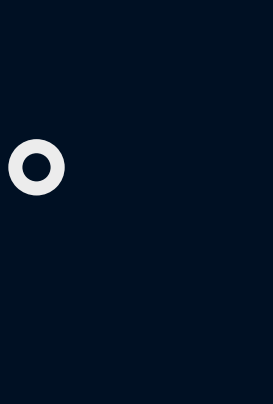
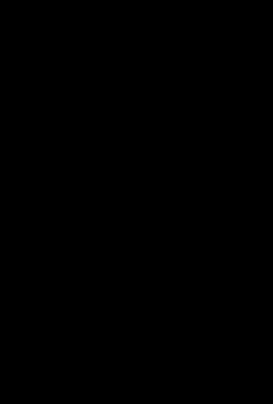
via: (36, 167) -> none

